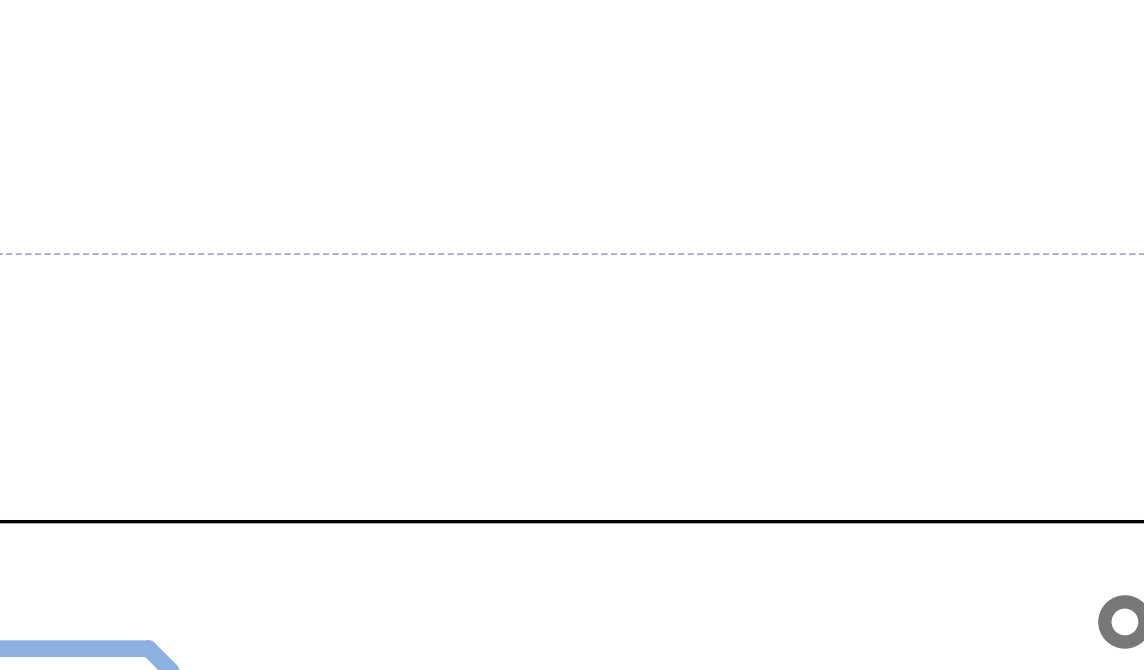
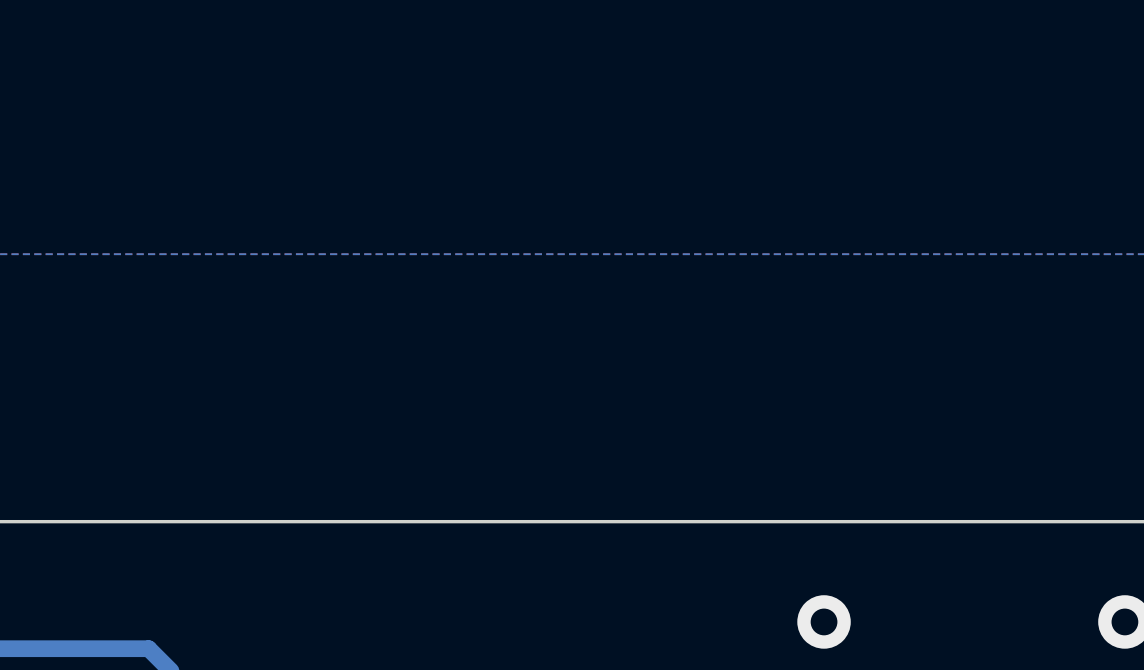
via: none -> (824, 621)

